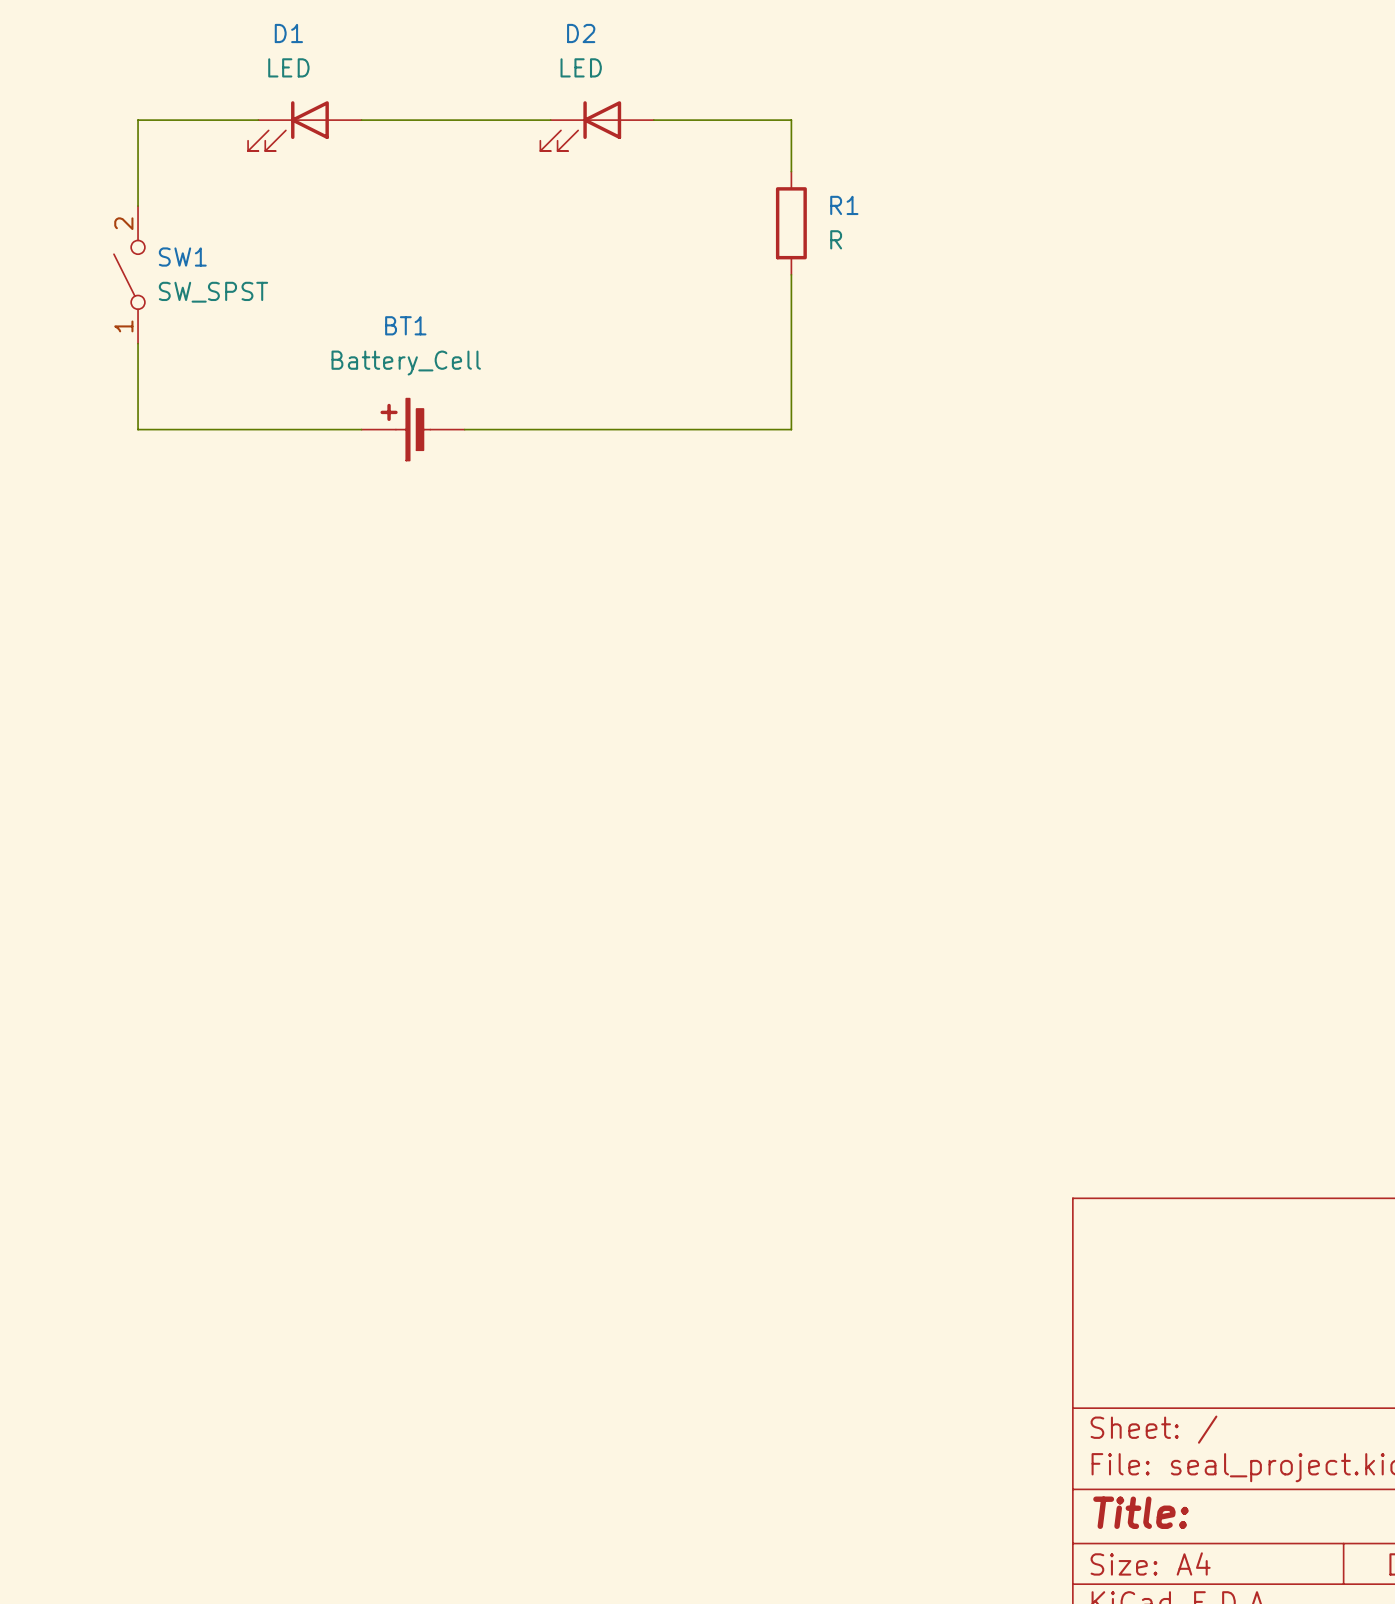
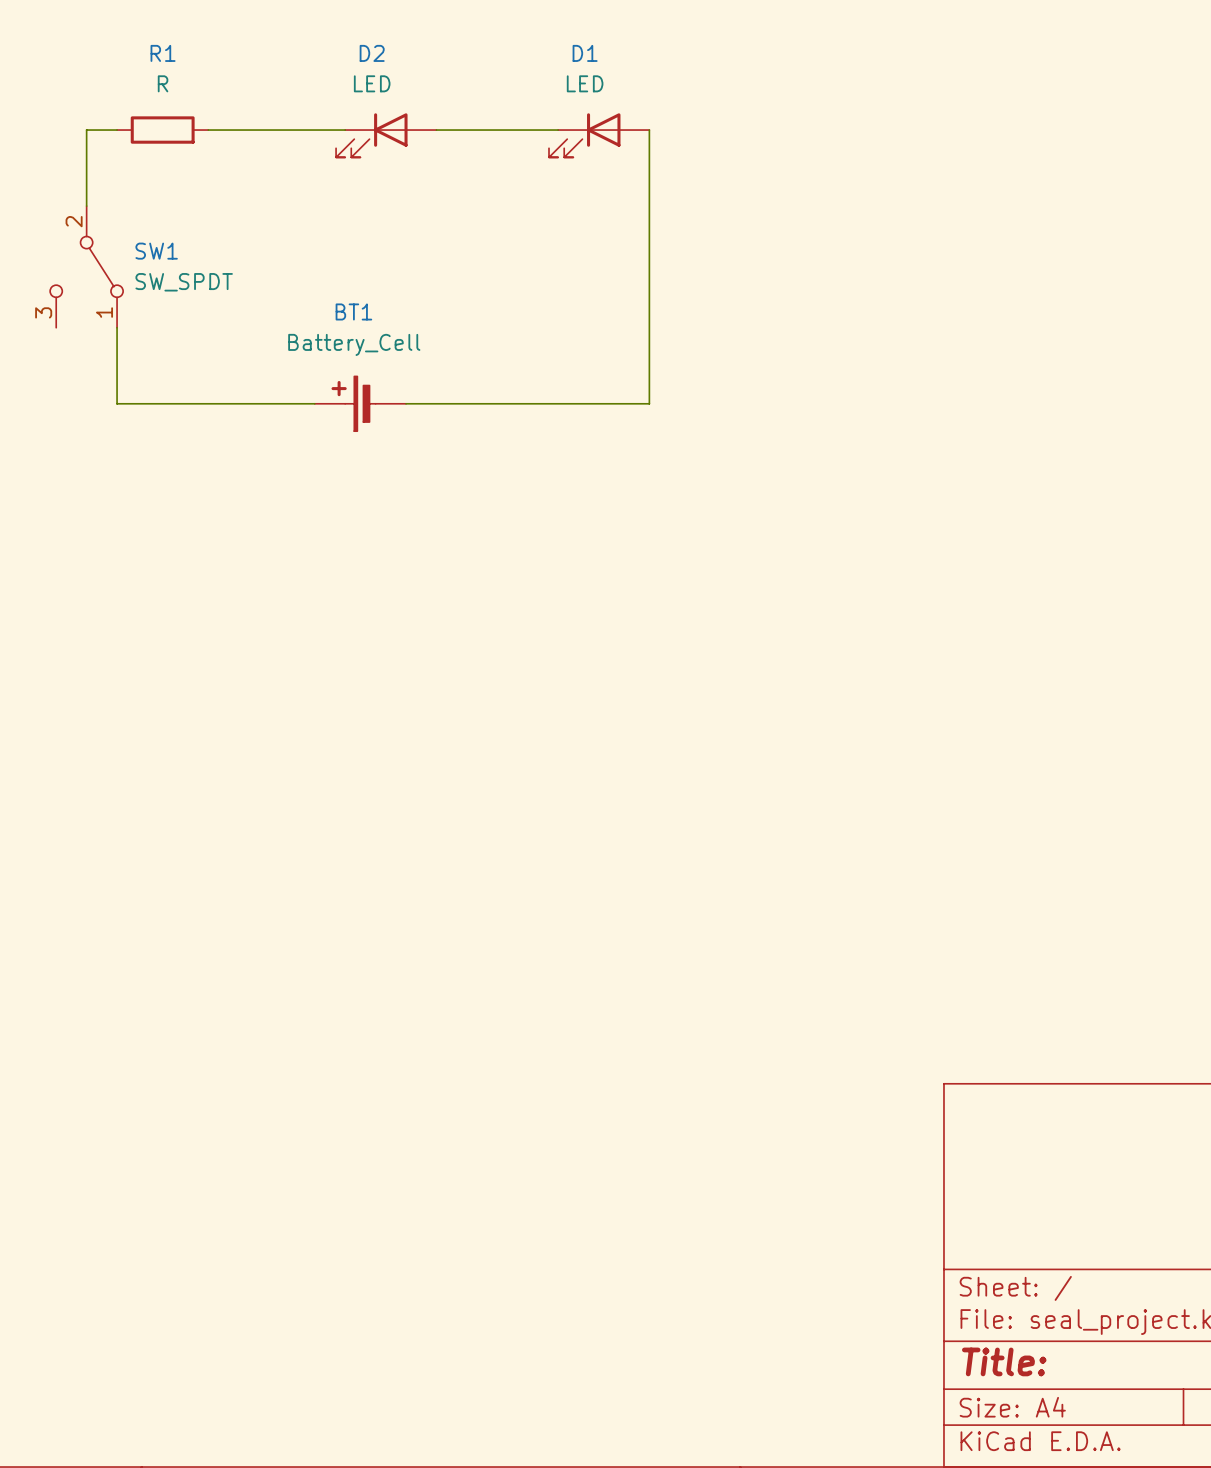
wire: none -> (117, 130) (86, 130) (86, 206)
wire: (241, 120) (138, 120) (138, 206) -> none
wire: (653, 120) (791, 120) (791, 171) -> none
D1 position: (304, 126) -> (599, 135)
D2 position: (597, 126) -> (386, 135)
R1 name position: R1 (844, 205) -> R1 (163, 53)
SW1 symbol: [113, 206, 145, 344] -> [50, 206, 124, 328]
R1 rotation: 0° (791, 223) -> 90° clockwise (162, 130)
R1 position: (791, 223) -> (162, 130)
R1 value position: R (836, 239) -> R (163, 83)
wire: (791, 274) (791, 429) (739, 429) -> (649, 130) (649, 403)
SW1 value: SW_SPST (213, 292) -> SW_SPDT (184, 282)

